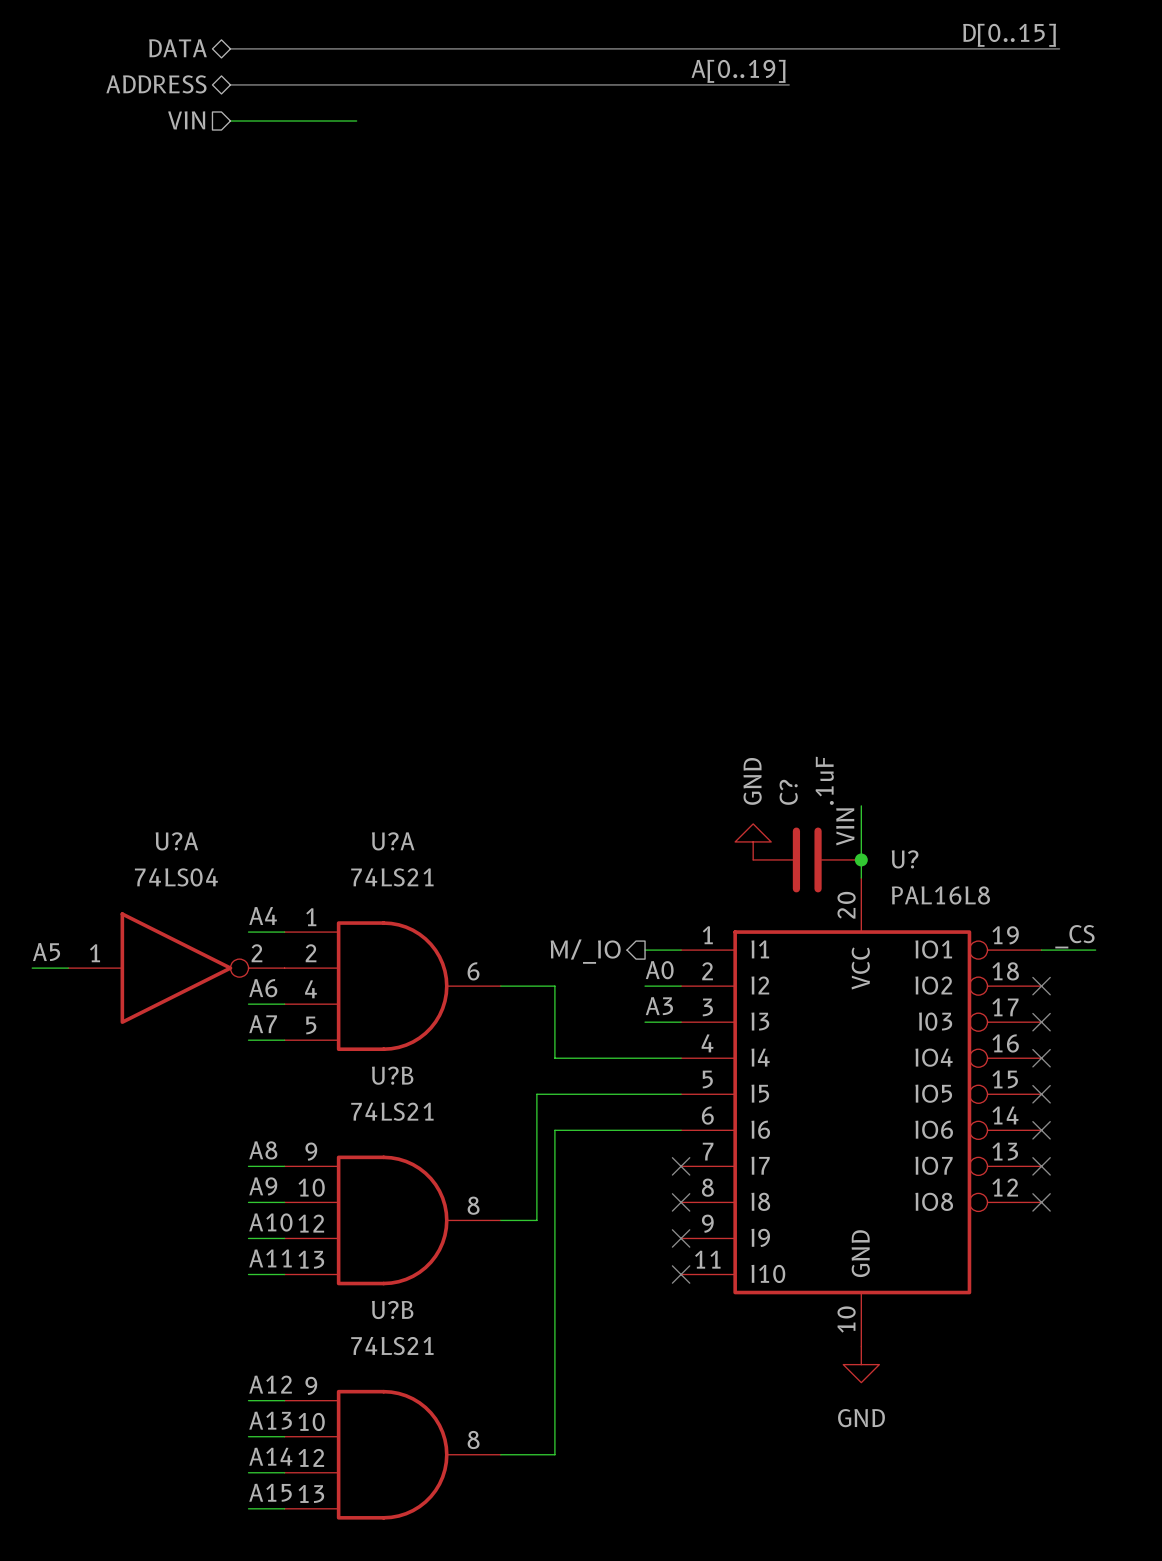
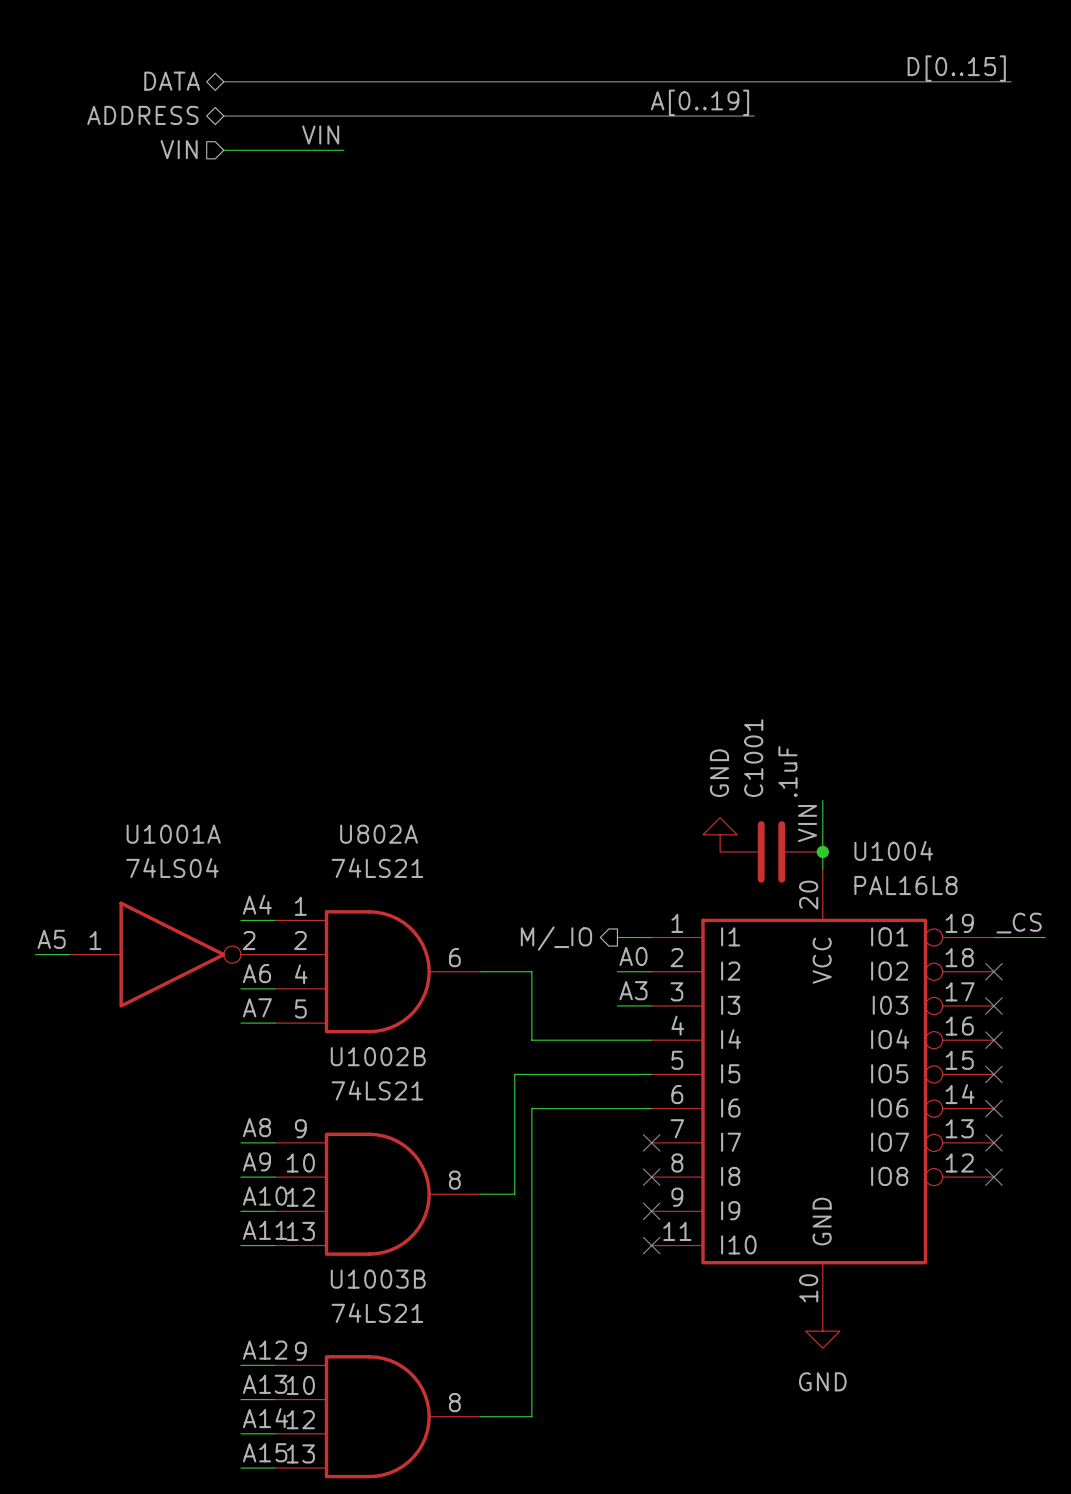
label: none -> VIN (320, 135)
C? name: C? (788, 792) -> C1001 (753, 758)
U?A name: U?A (176, 841) -> U1001A (173, 834)
U?A name: U?A (393, 841) -> U802A (379, 834)
U? name: U? (905, 859) -> U1004 (893, 850)
U?B name: U?B (392, 1075) -> U1002B (378, 1056)
U?B name: U?B (392, 1309) -> U1003B (378, 1279)

